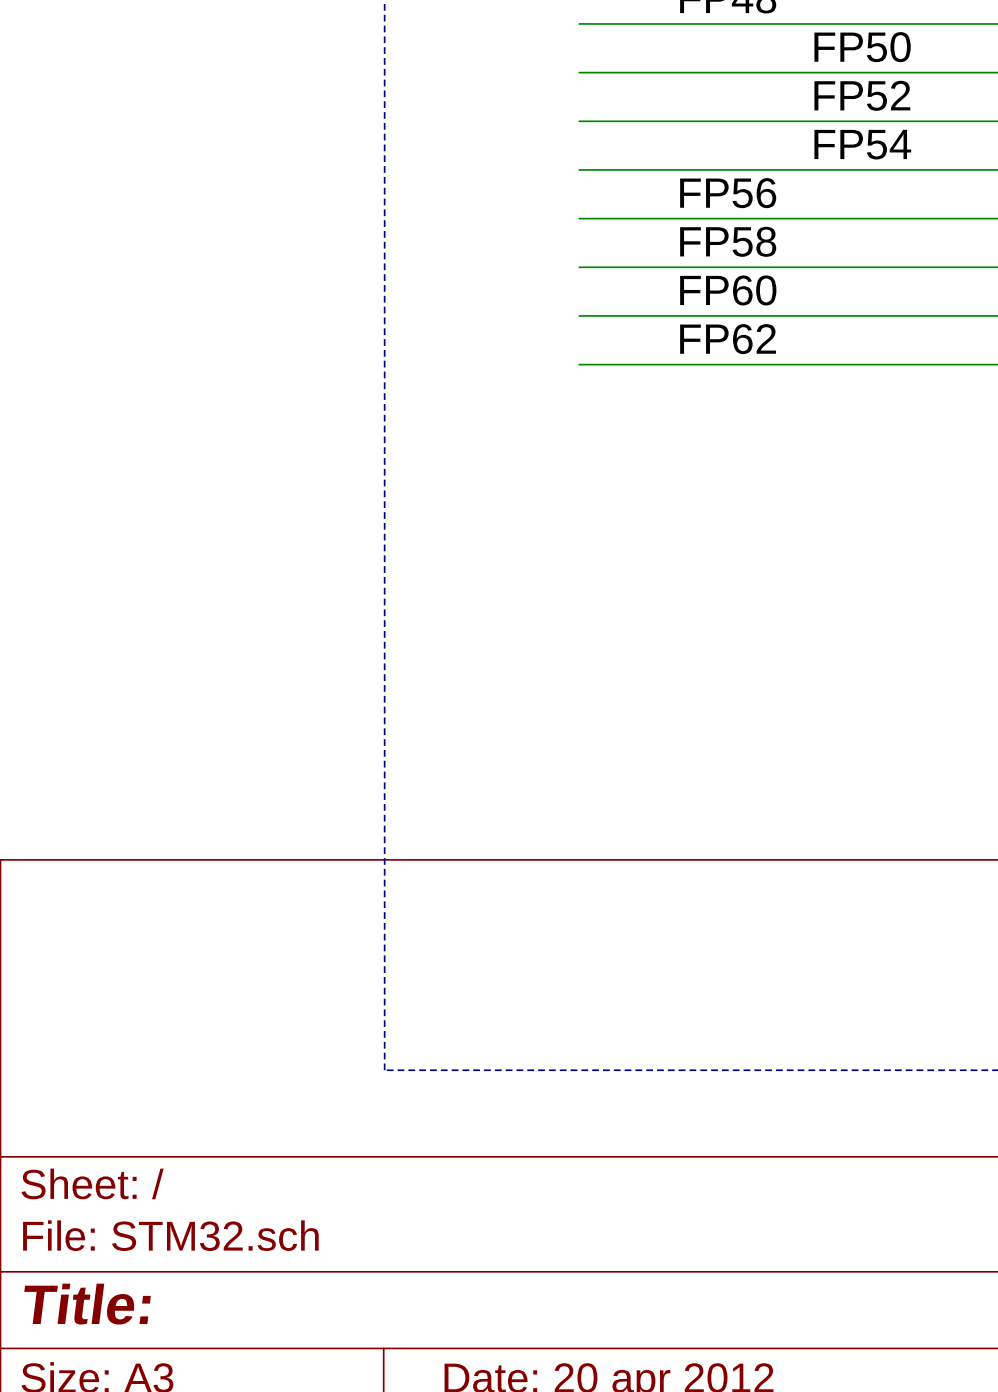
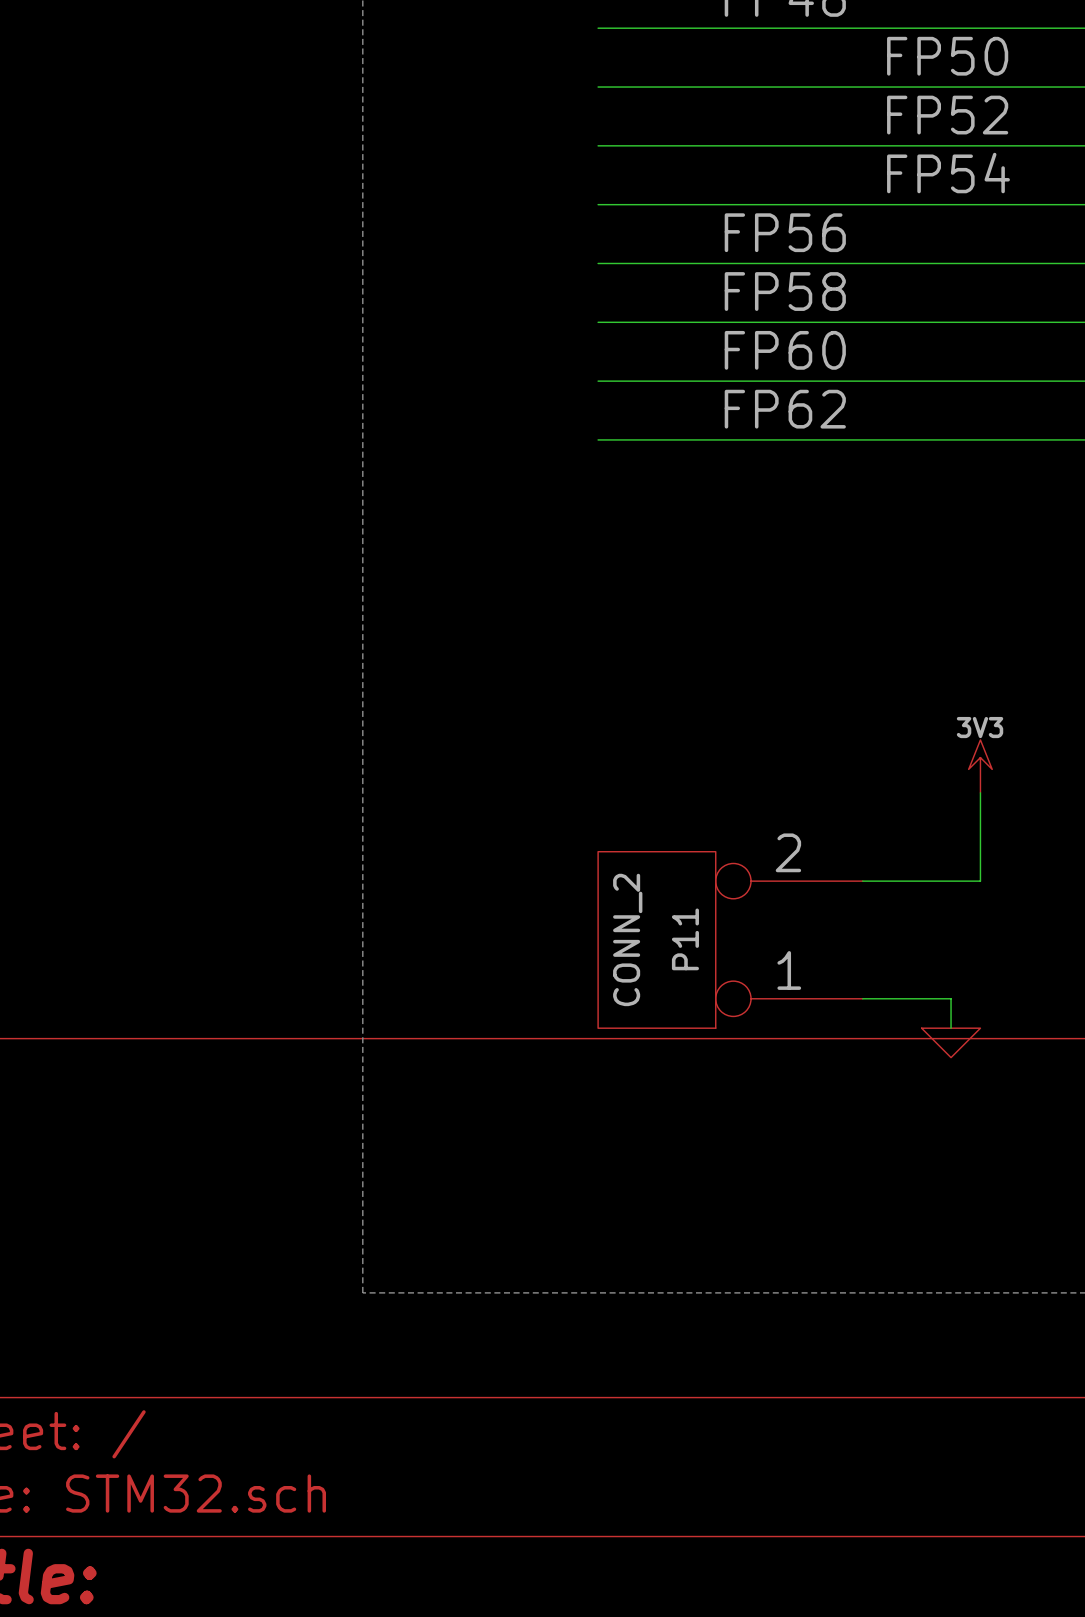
power symbol: none -> 3V3 (980, 766)
wire: none -> (980, 792) (980, 881) (862, 881)
P11: none -> CONN_2 (730, 939)
wire: none -> (862, 998) (951, 998) (951, 1028)
power symbol: none -> (951, 1042)

